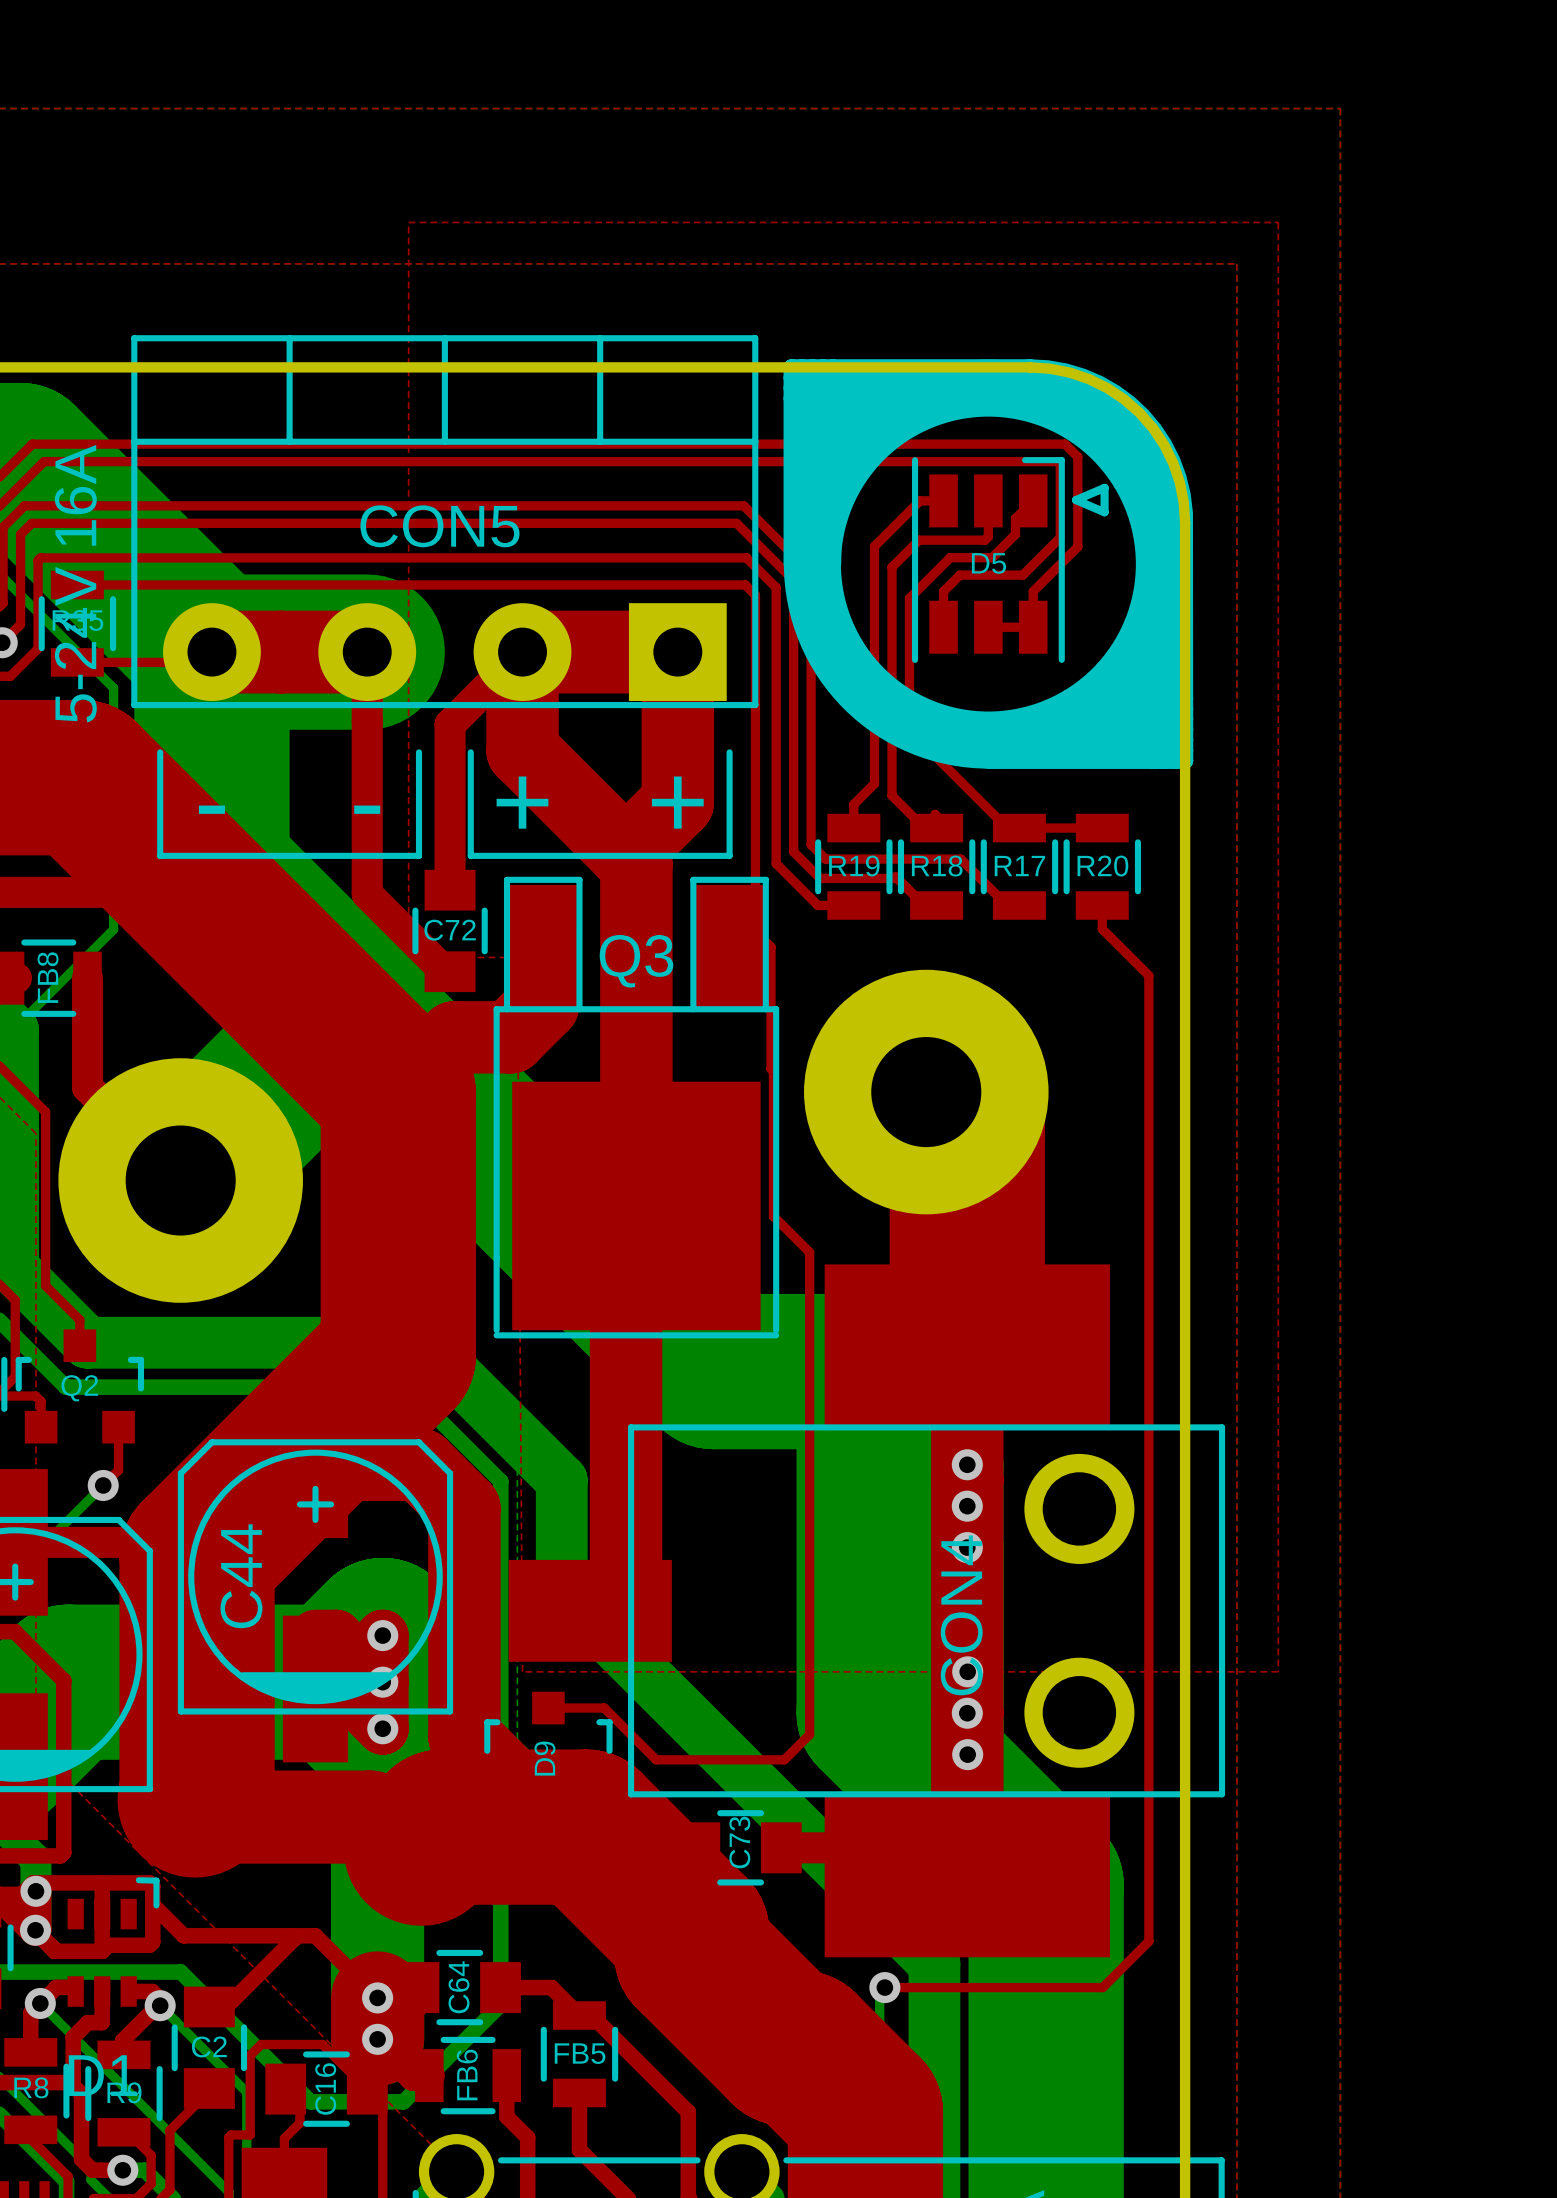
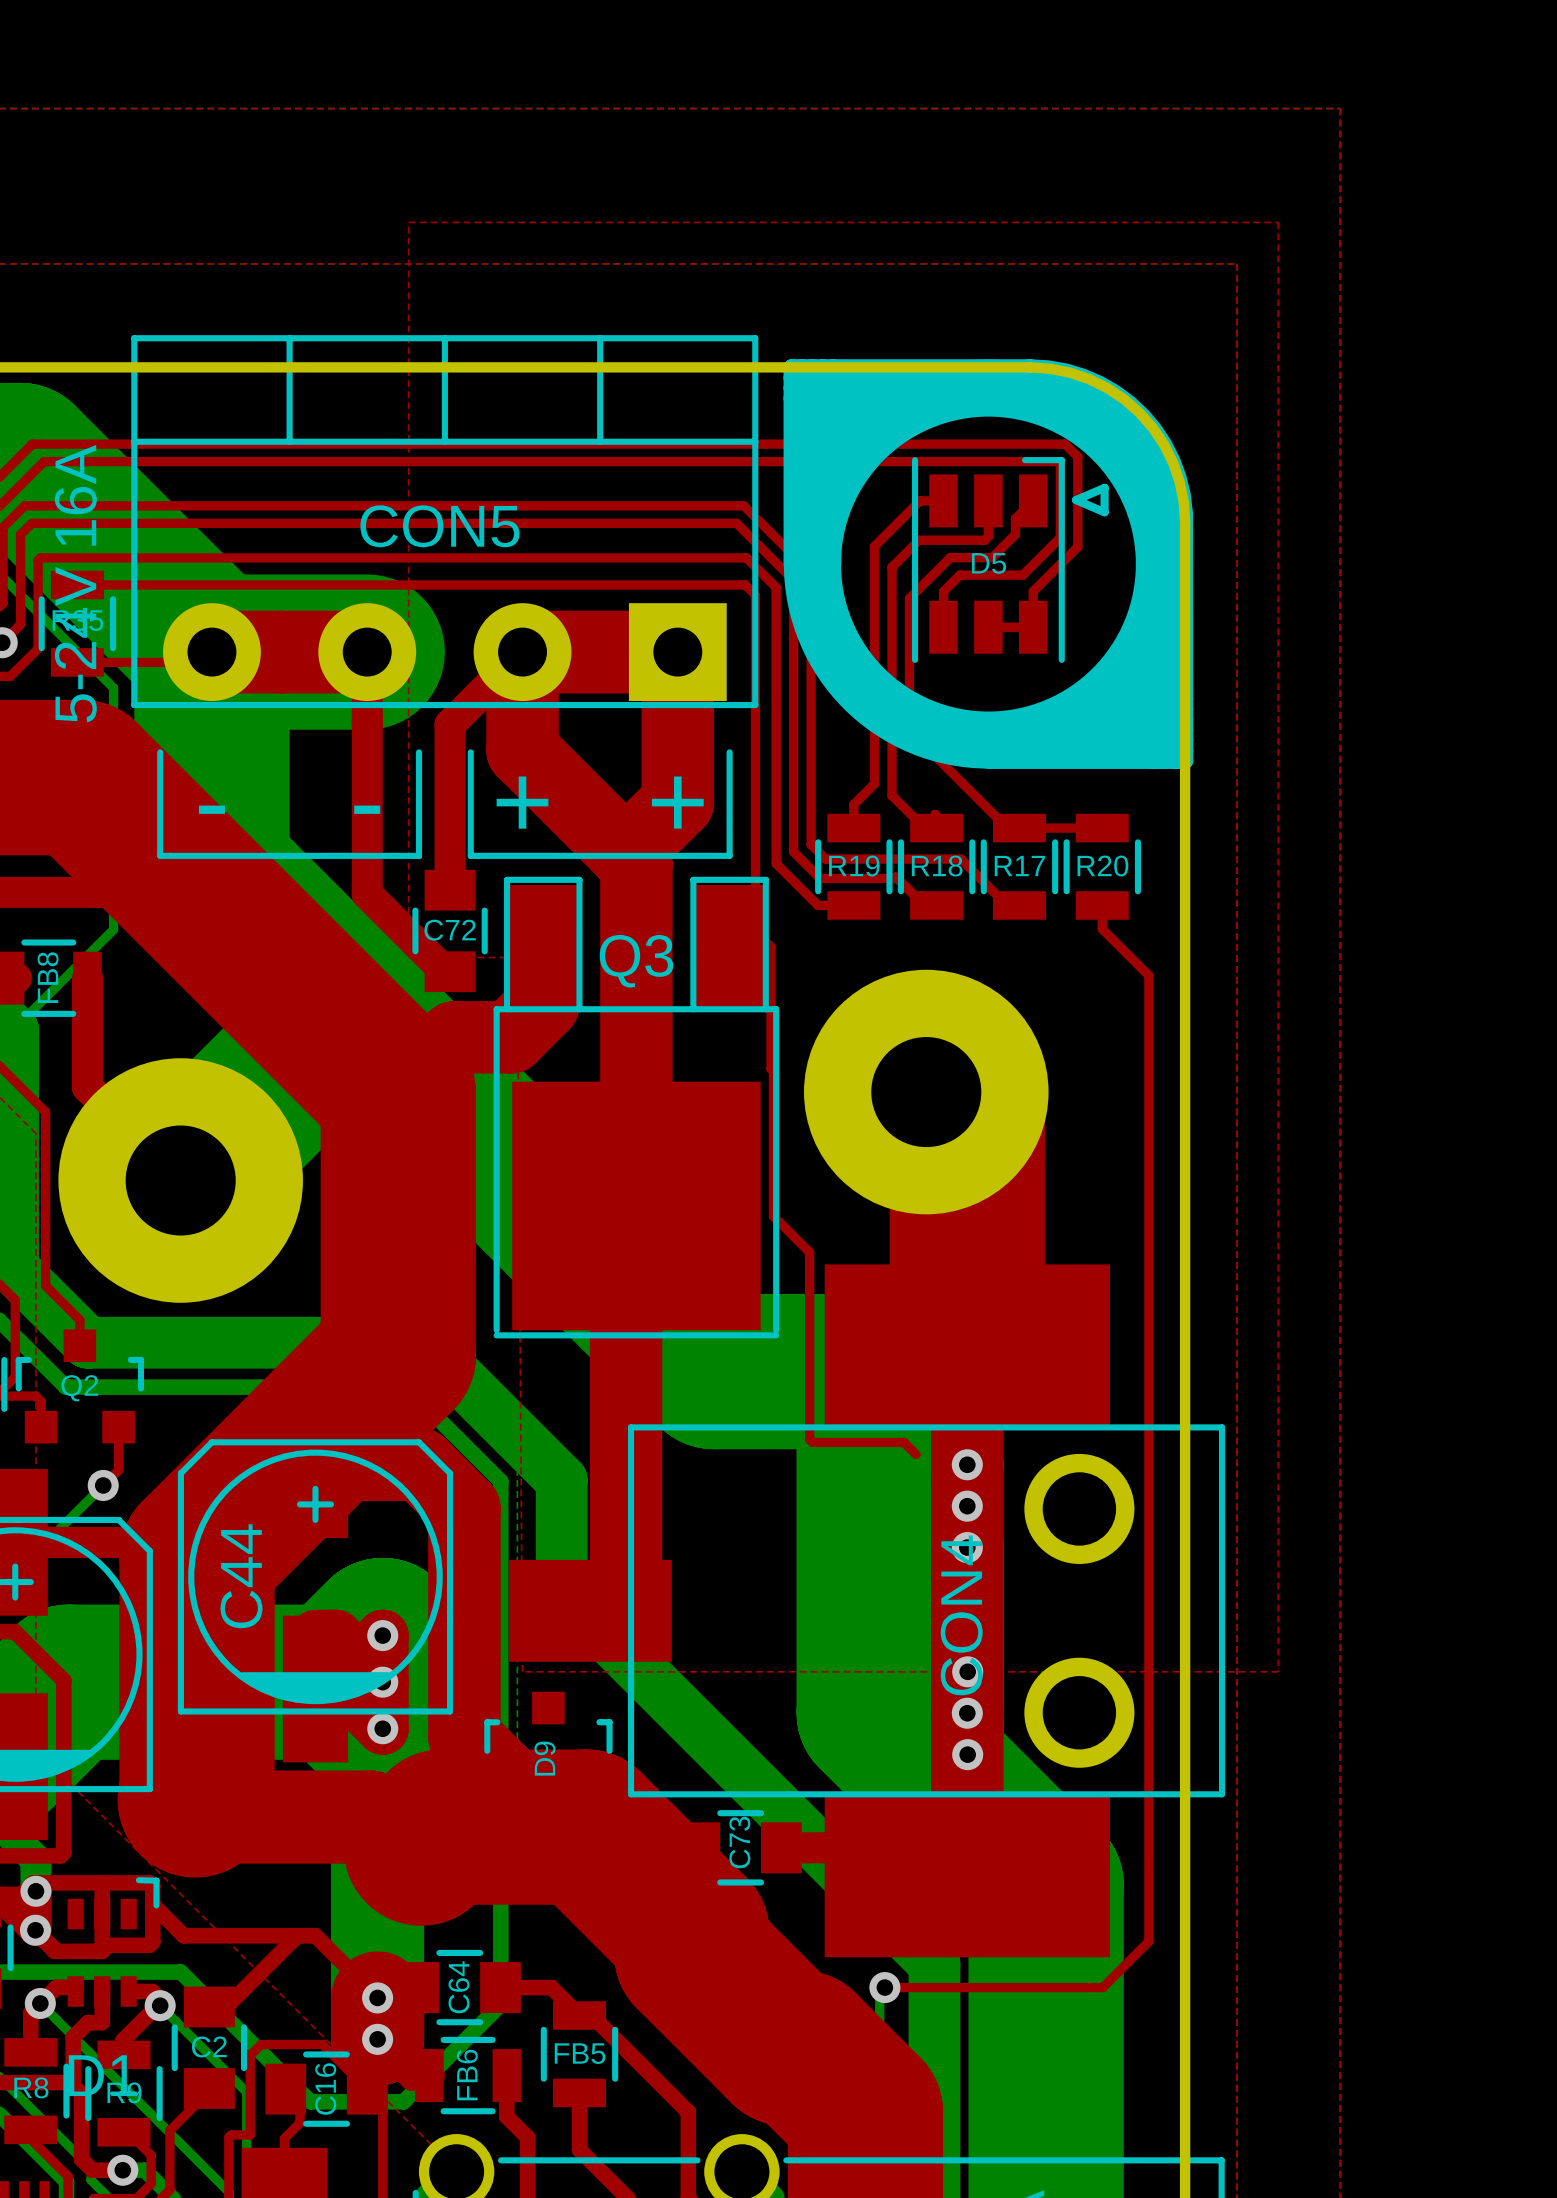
top track: (809, 1439) (809, 1734) (784, 1759) (656, 1759) (604, 1708) (548, 1708) -> (809, 1439) (812, 1442) (903, 1442) (916, 1454)

